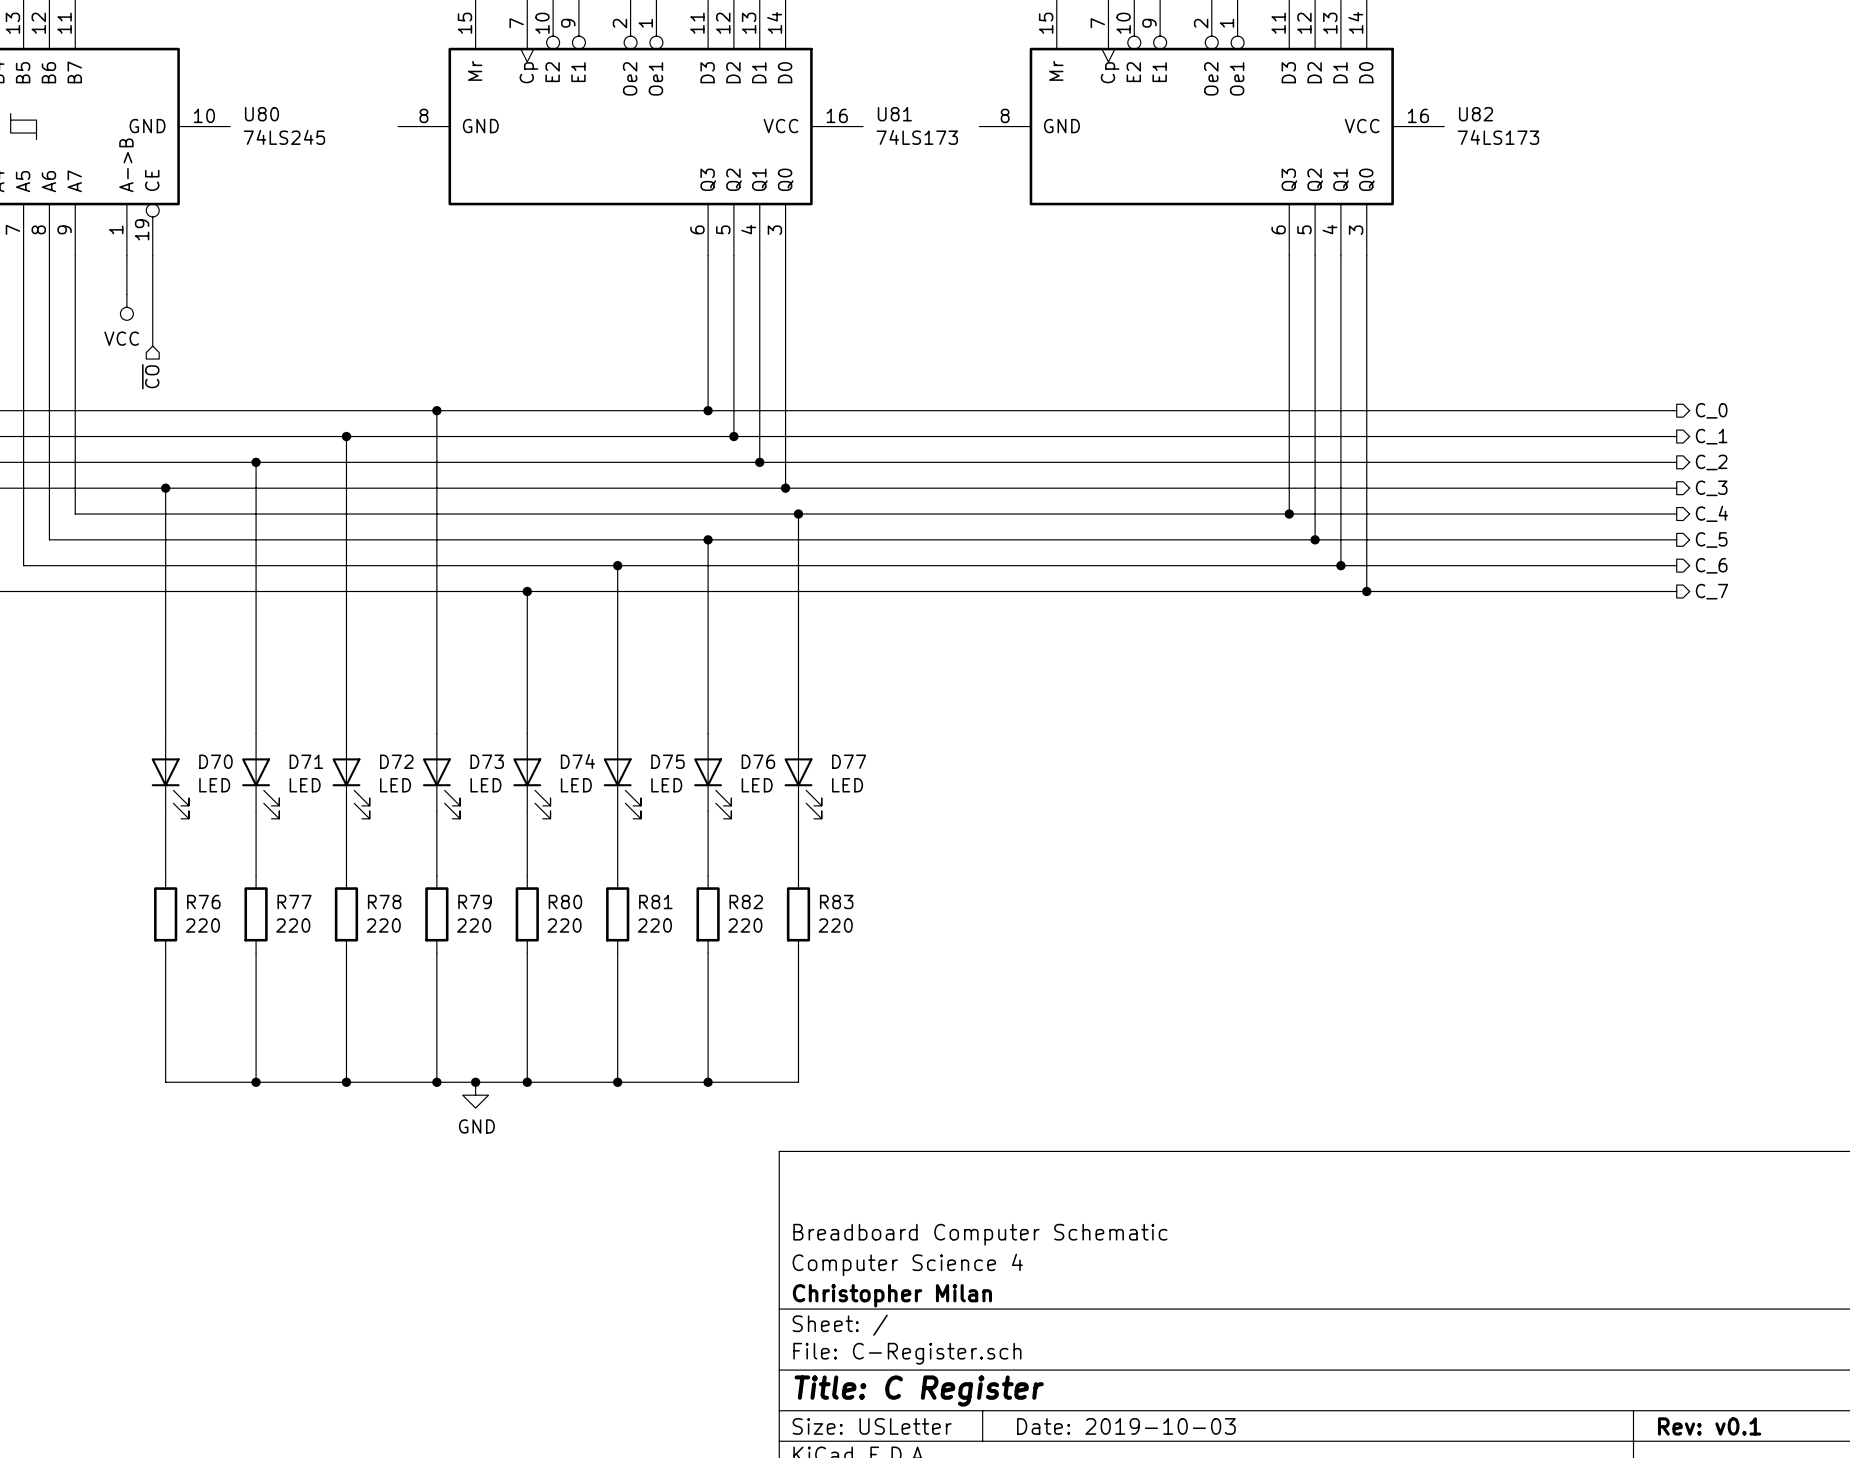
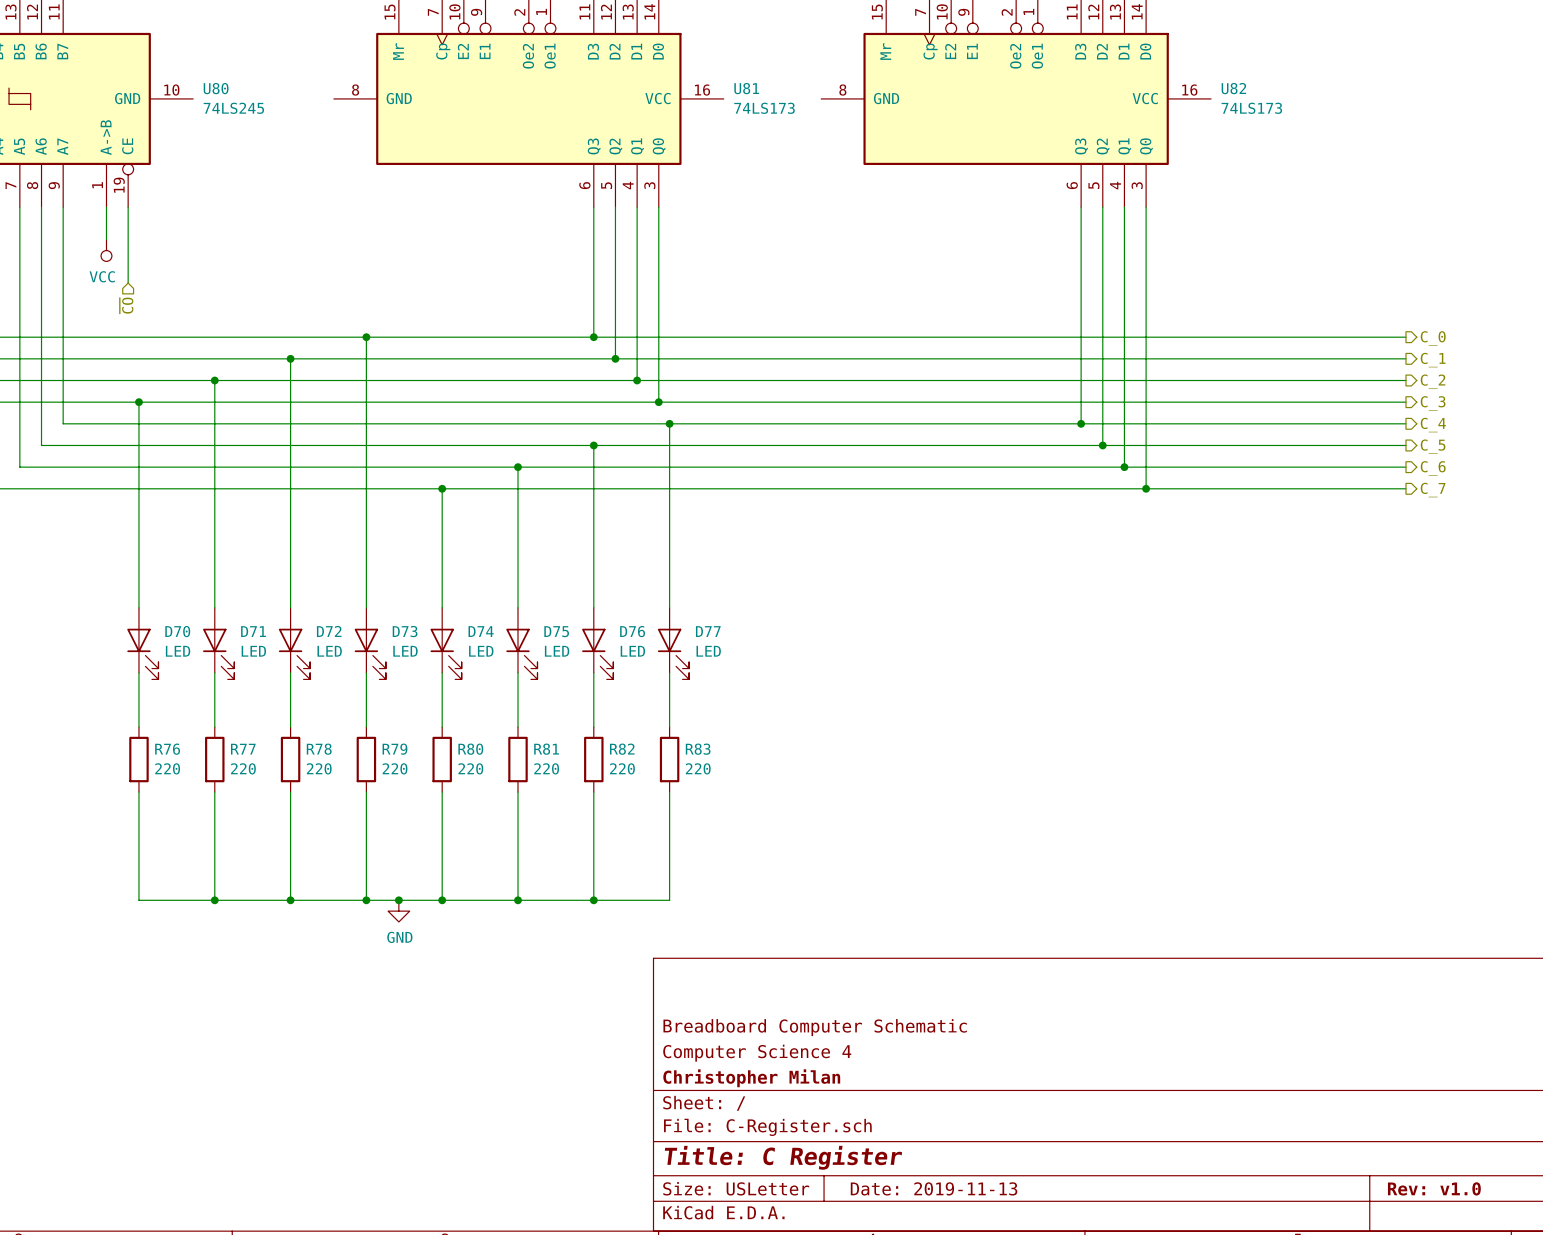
title block: Date: 2019-10-03 (1126, 1426) -> Date: 2019-11-13 (934, 1188)
title block: Rev: v0.1 (1709, 1426) -> Rev: v1.0 (1434, 1188)

